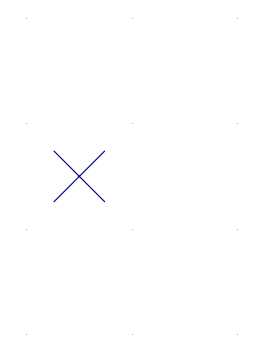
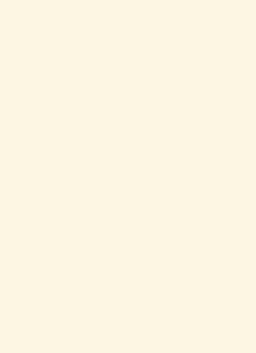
no-connect mark: (79, 176) -> none

